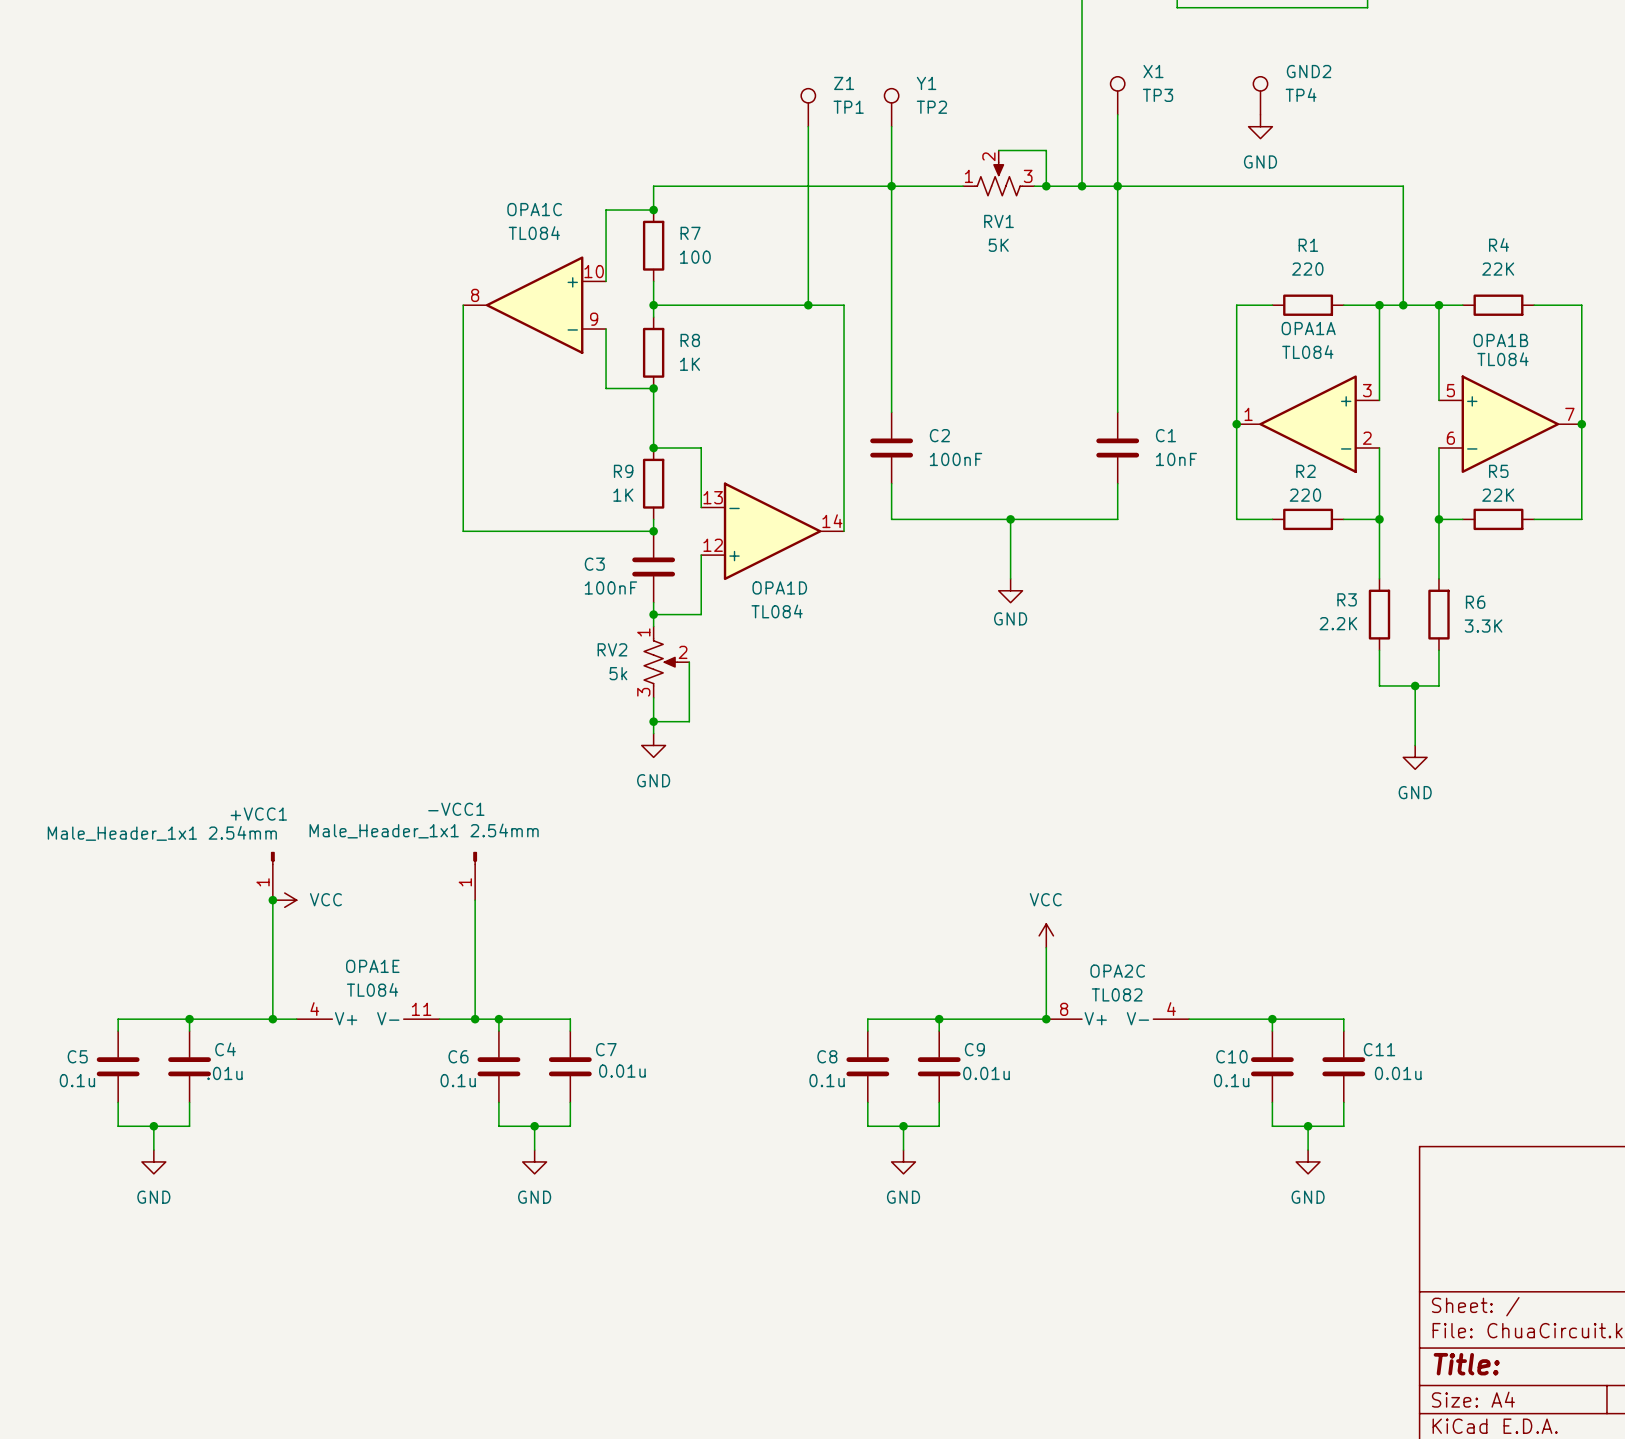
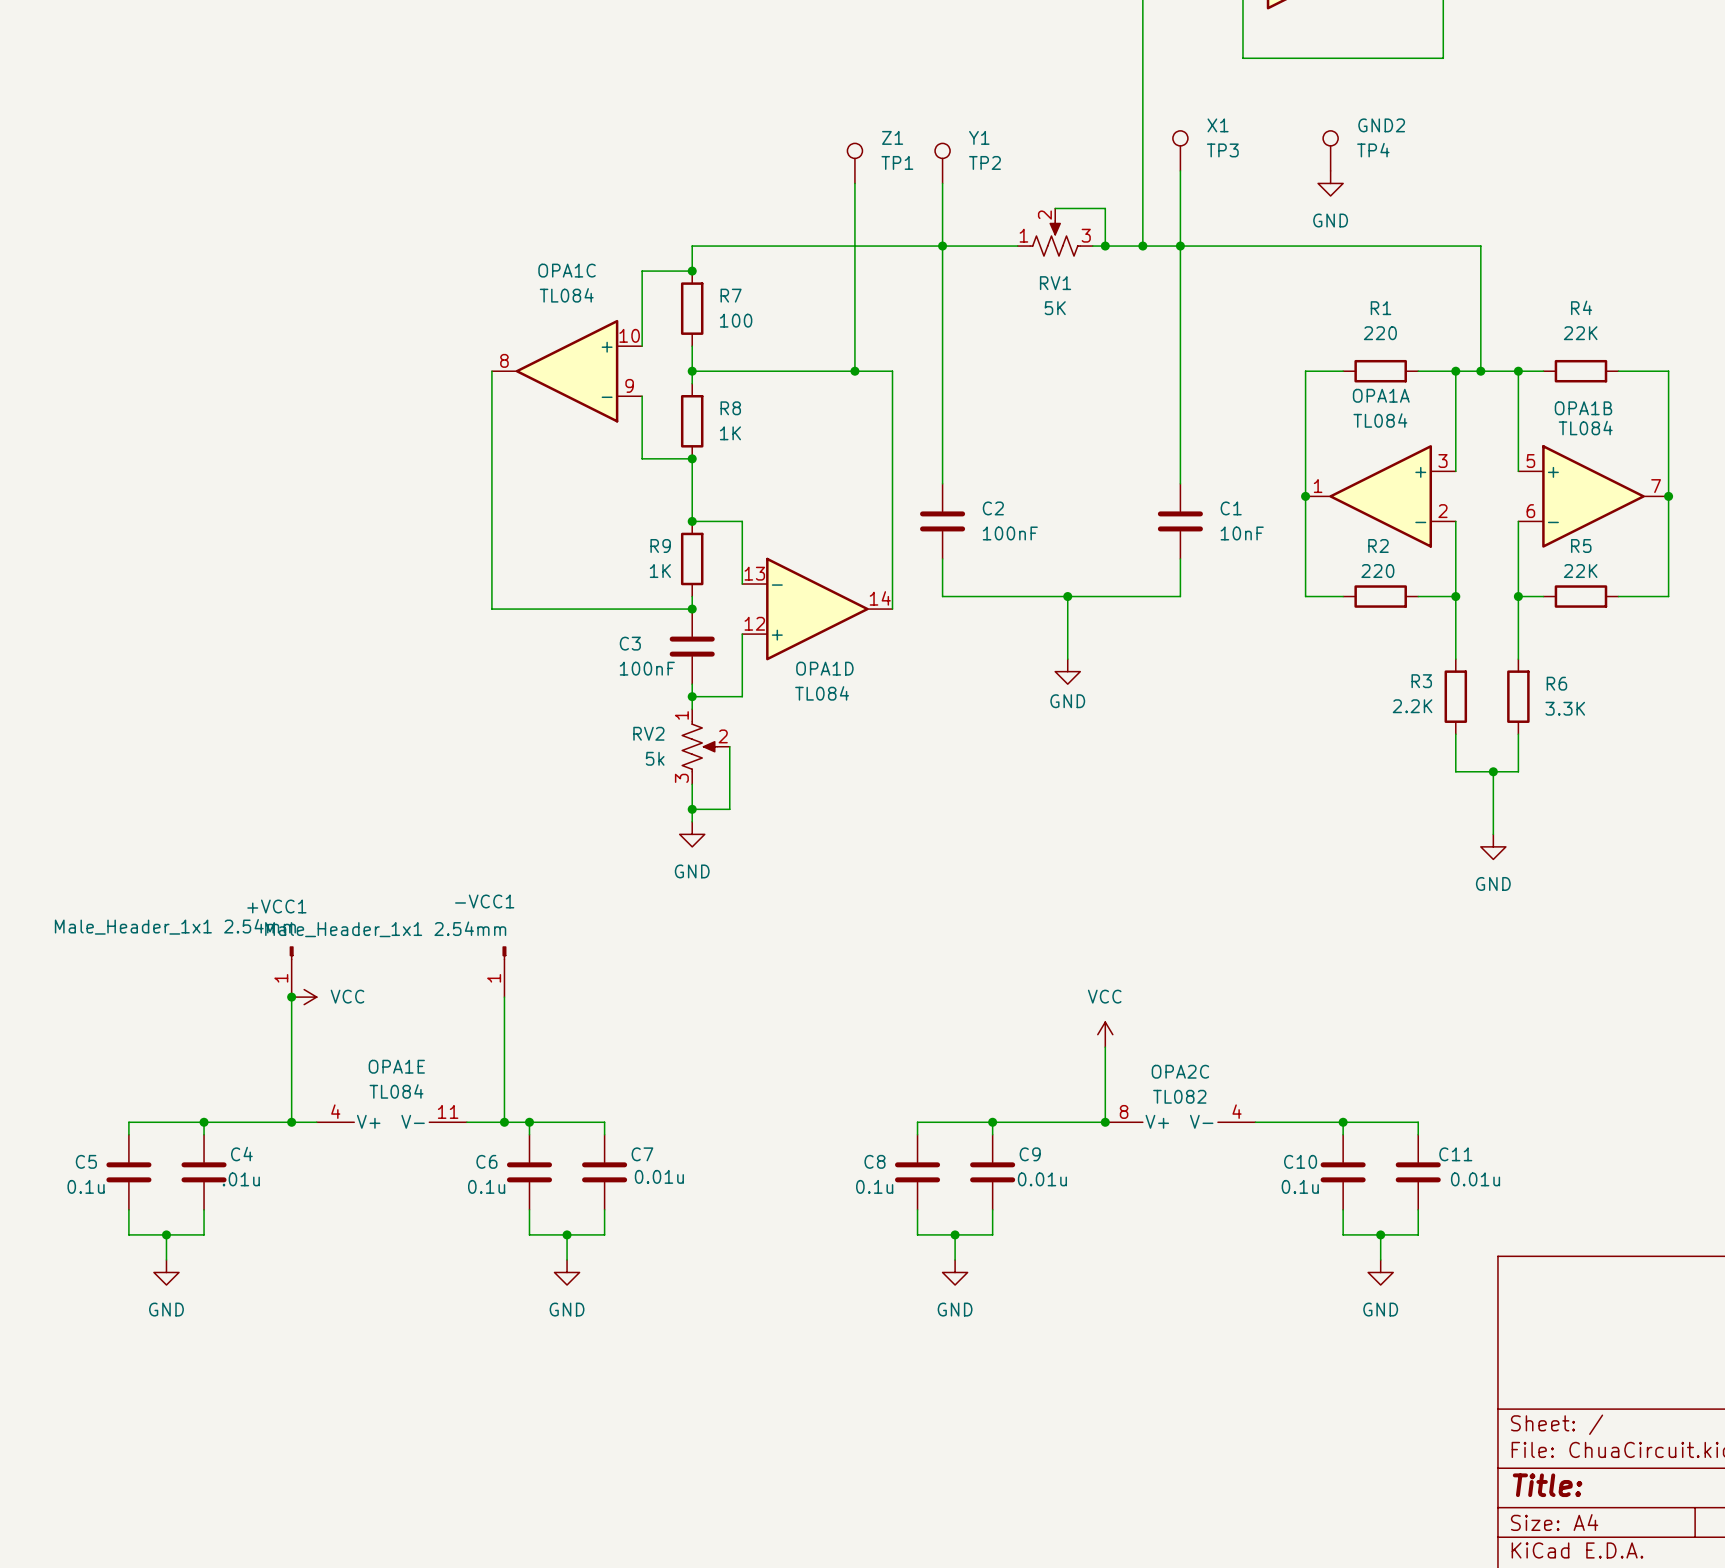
-VCC1 value position: Male_Header_1x1 2.54mm (424, 830) -> Male_Header_1x1 2.54mm (385, 929)

